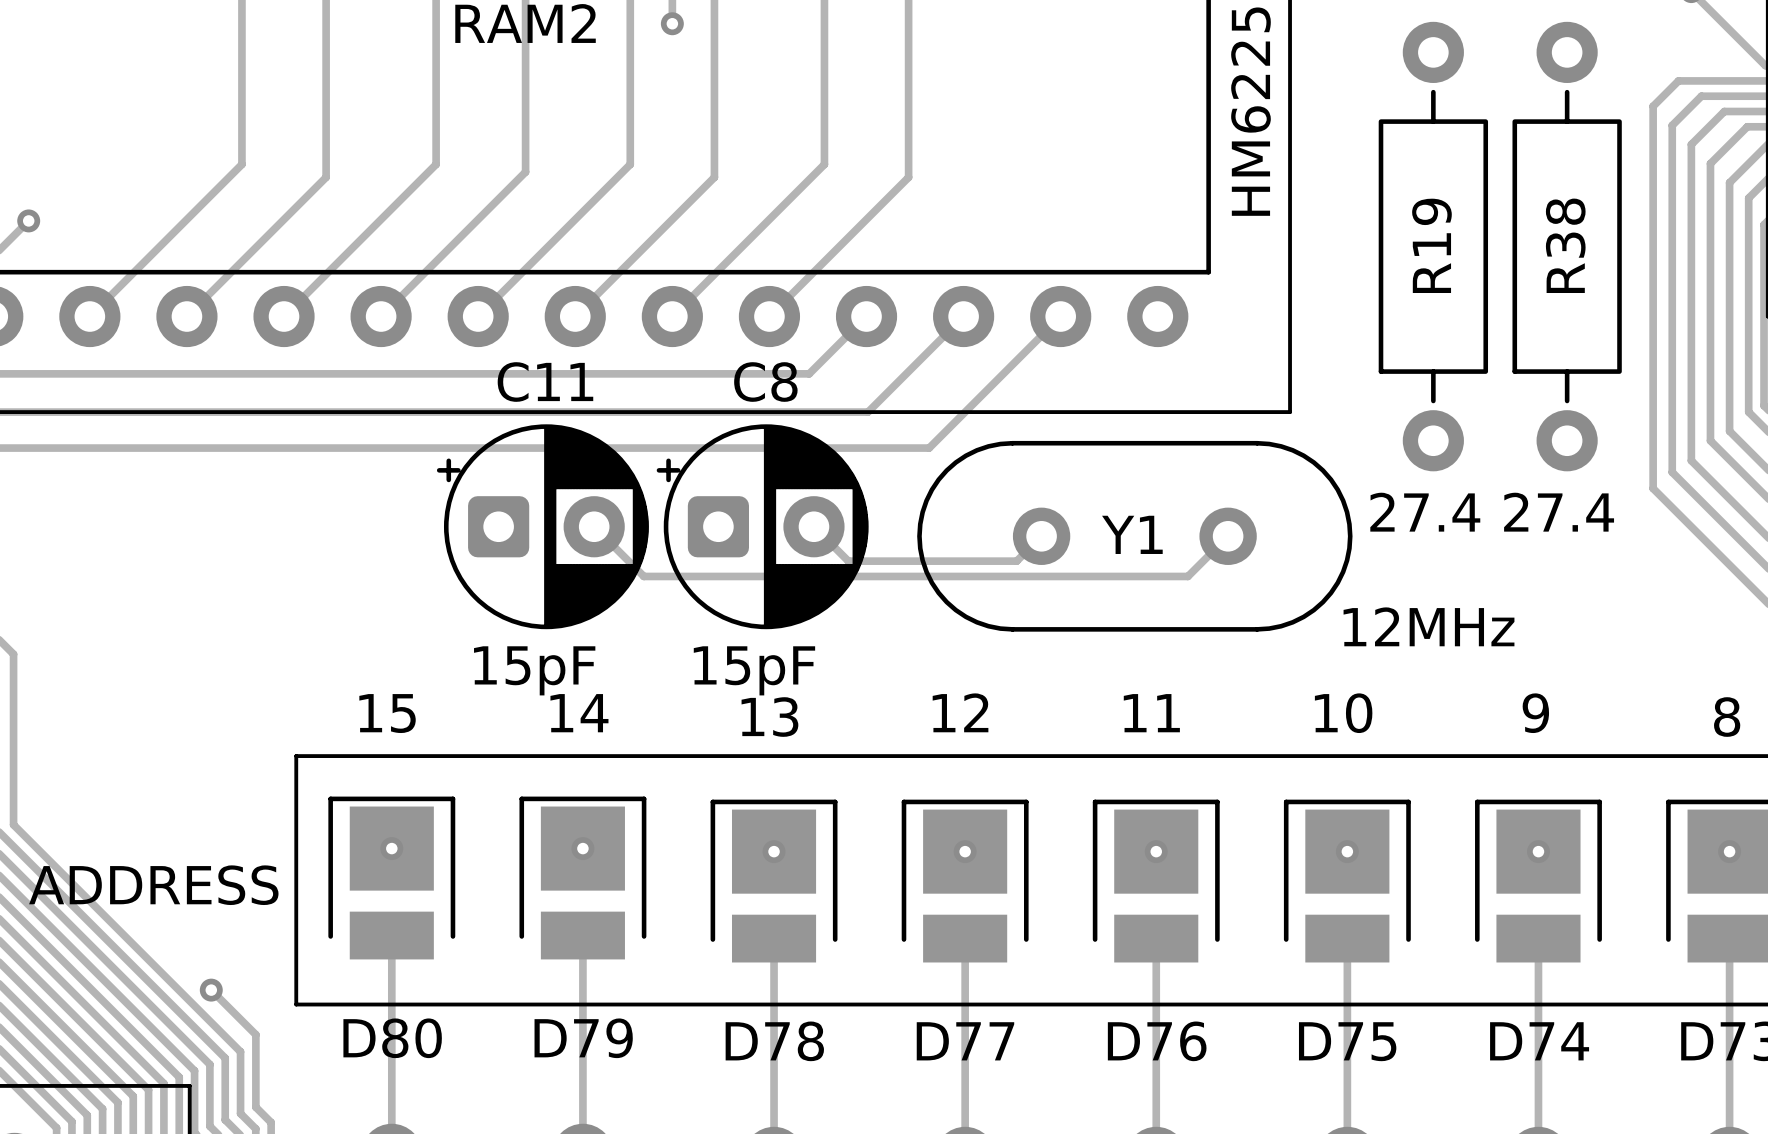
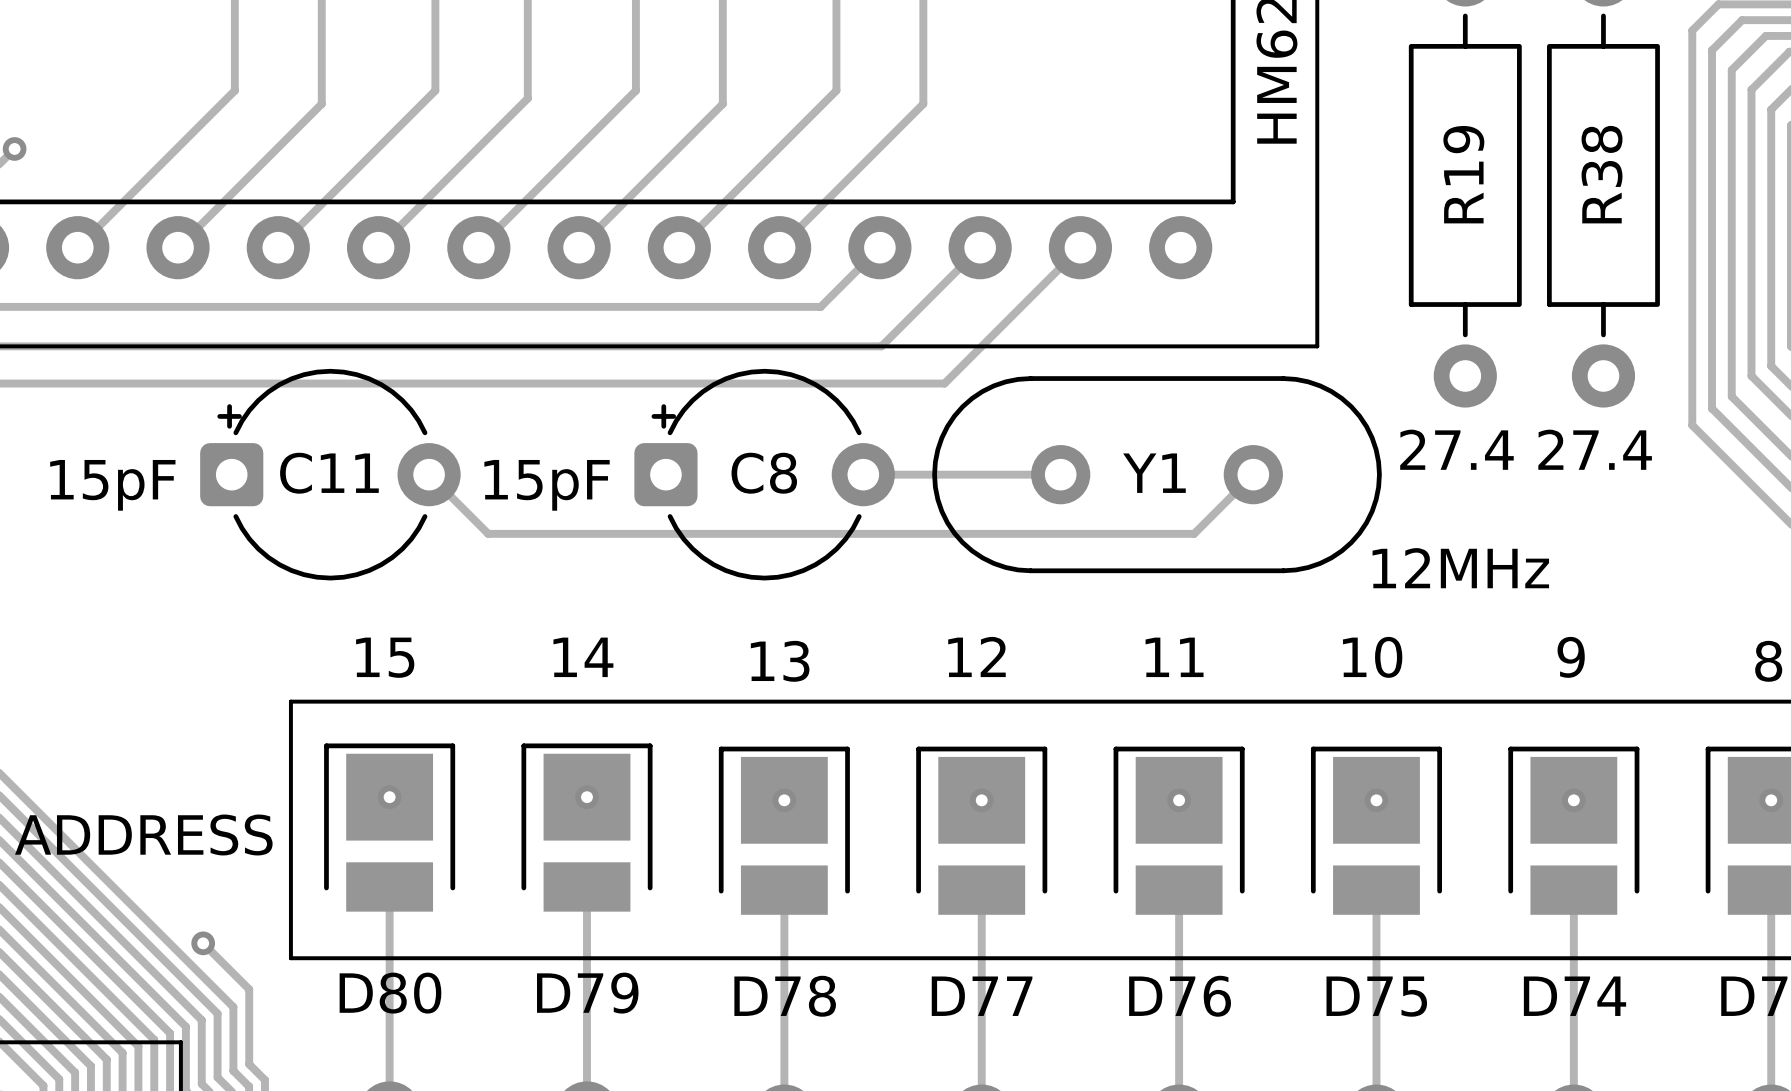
C11 name position: C11 (545, 382) -> C11 (329, 473)
C8 name position: C8 (765, 382) -> C8 (764, 473)
C11 footprint: [436, 424, 649, 630] -> [200, 368, 461, 581]
C8 footprint: [656, 424, 869, 630] -> [634, 368, 895, 581]
track: (594, 526) (643, 576) (1187, 576) -> (429, 474) (488, 533) (1194, 533) (1211, 516)
track: (813, 526) (848, 561) (1016, 561) (1041, 536) -> (863, 474) (1060, 474)
text: none -> 15pF (112, 485)
text: none -> 15pF (547, 485)
text: 15pF (534, 670) -> none
text: 15pF (754, 670) -> none

